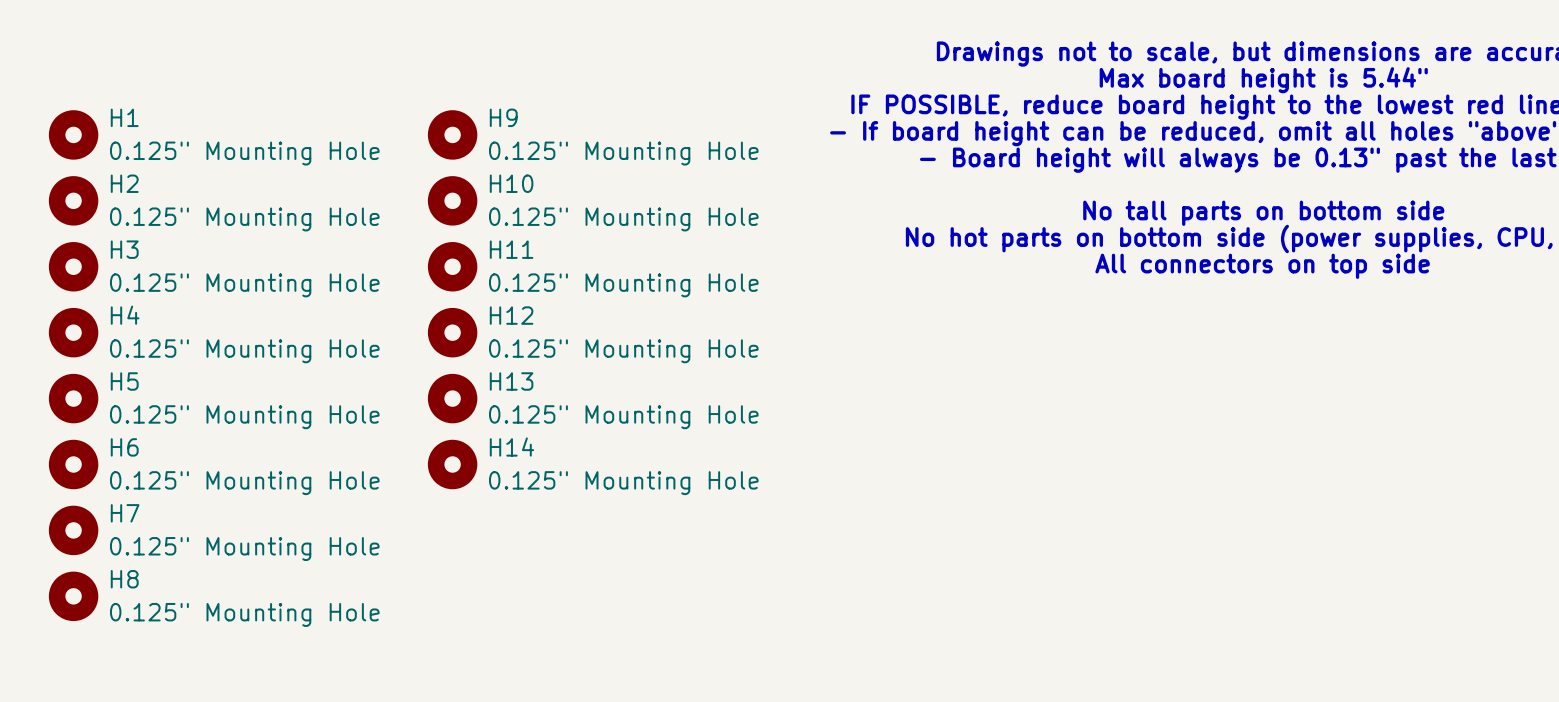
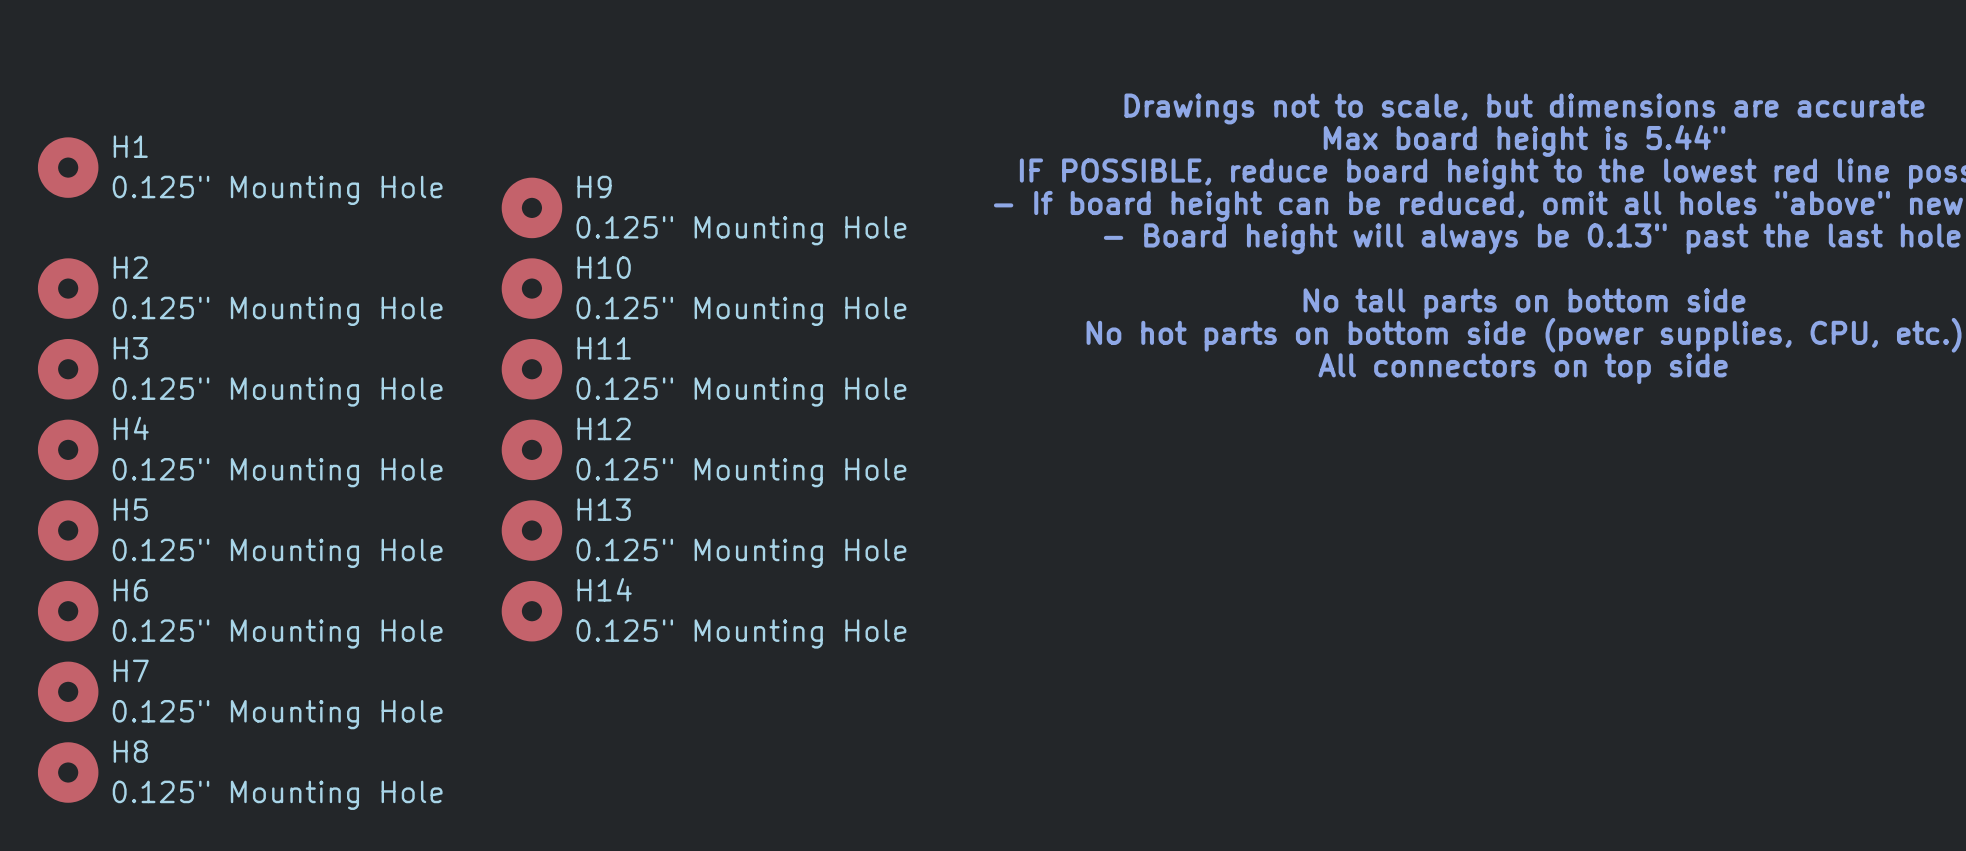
H1 position: (73, 134) -> (68, 167)

